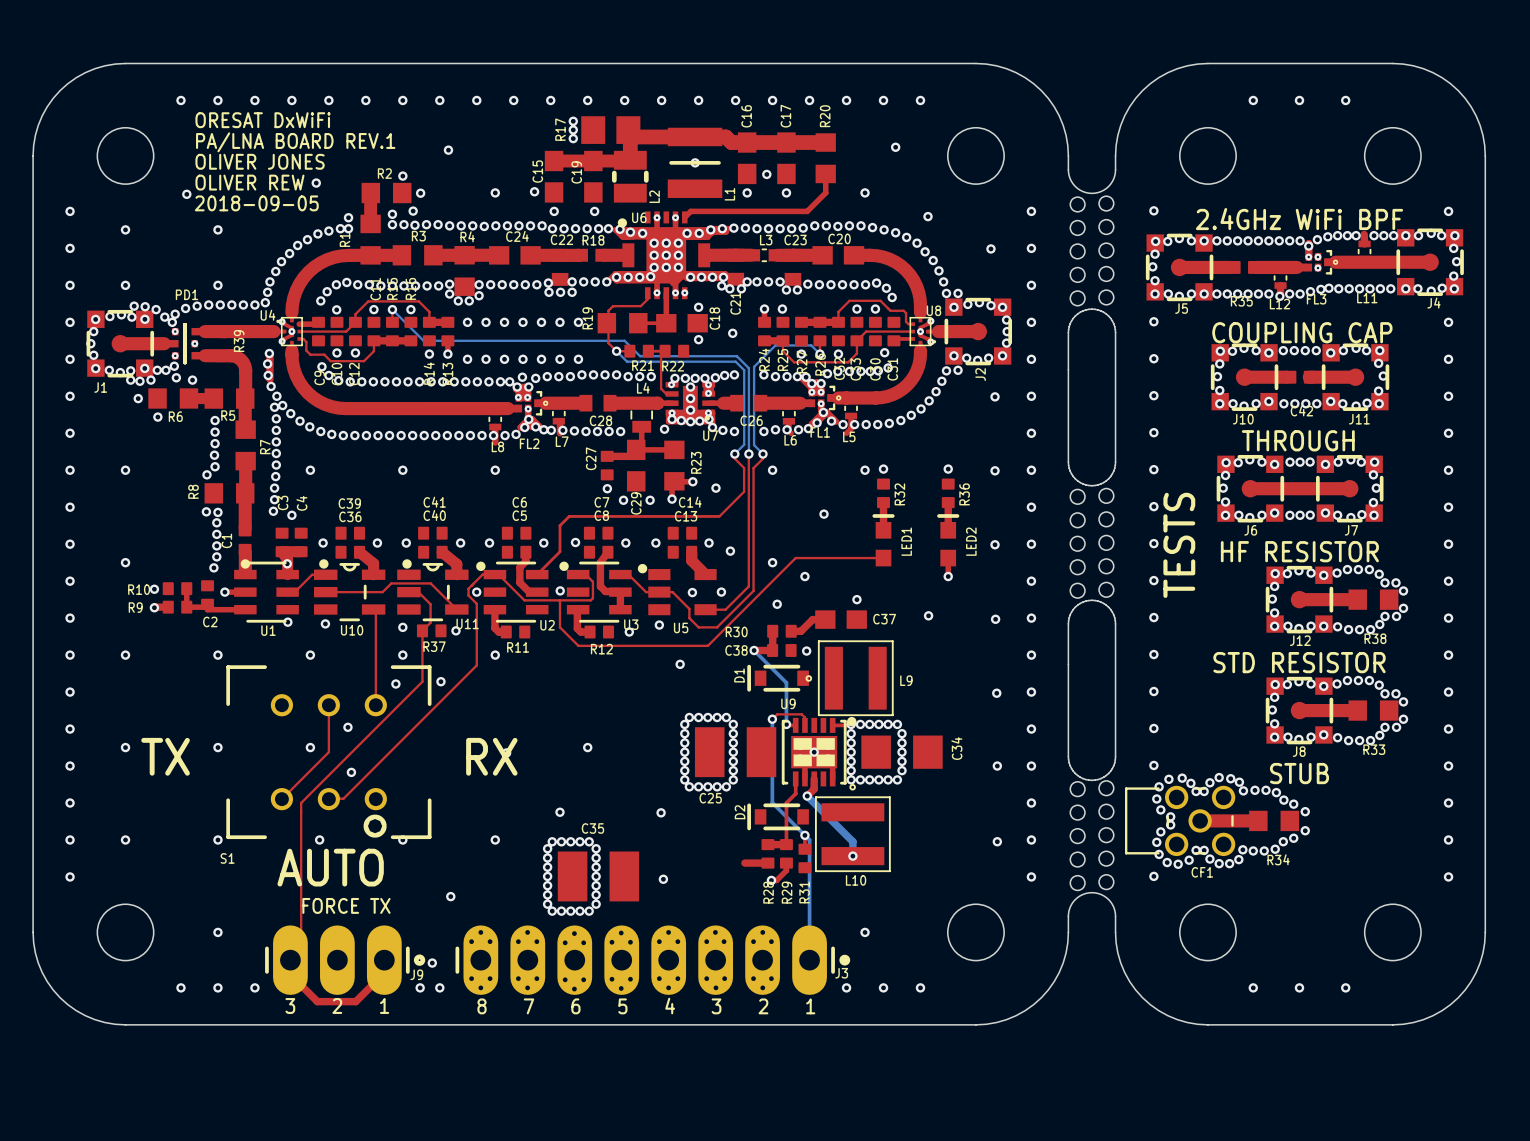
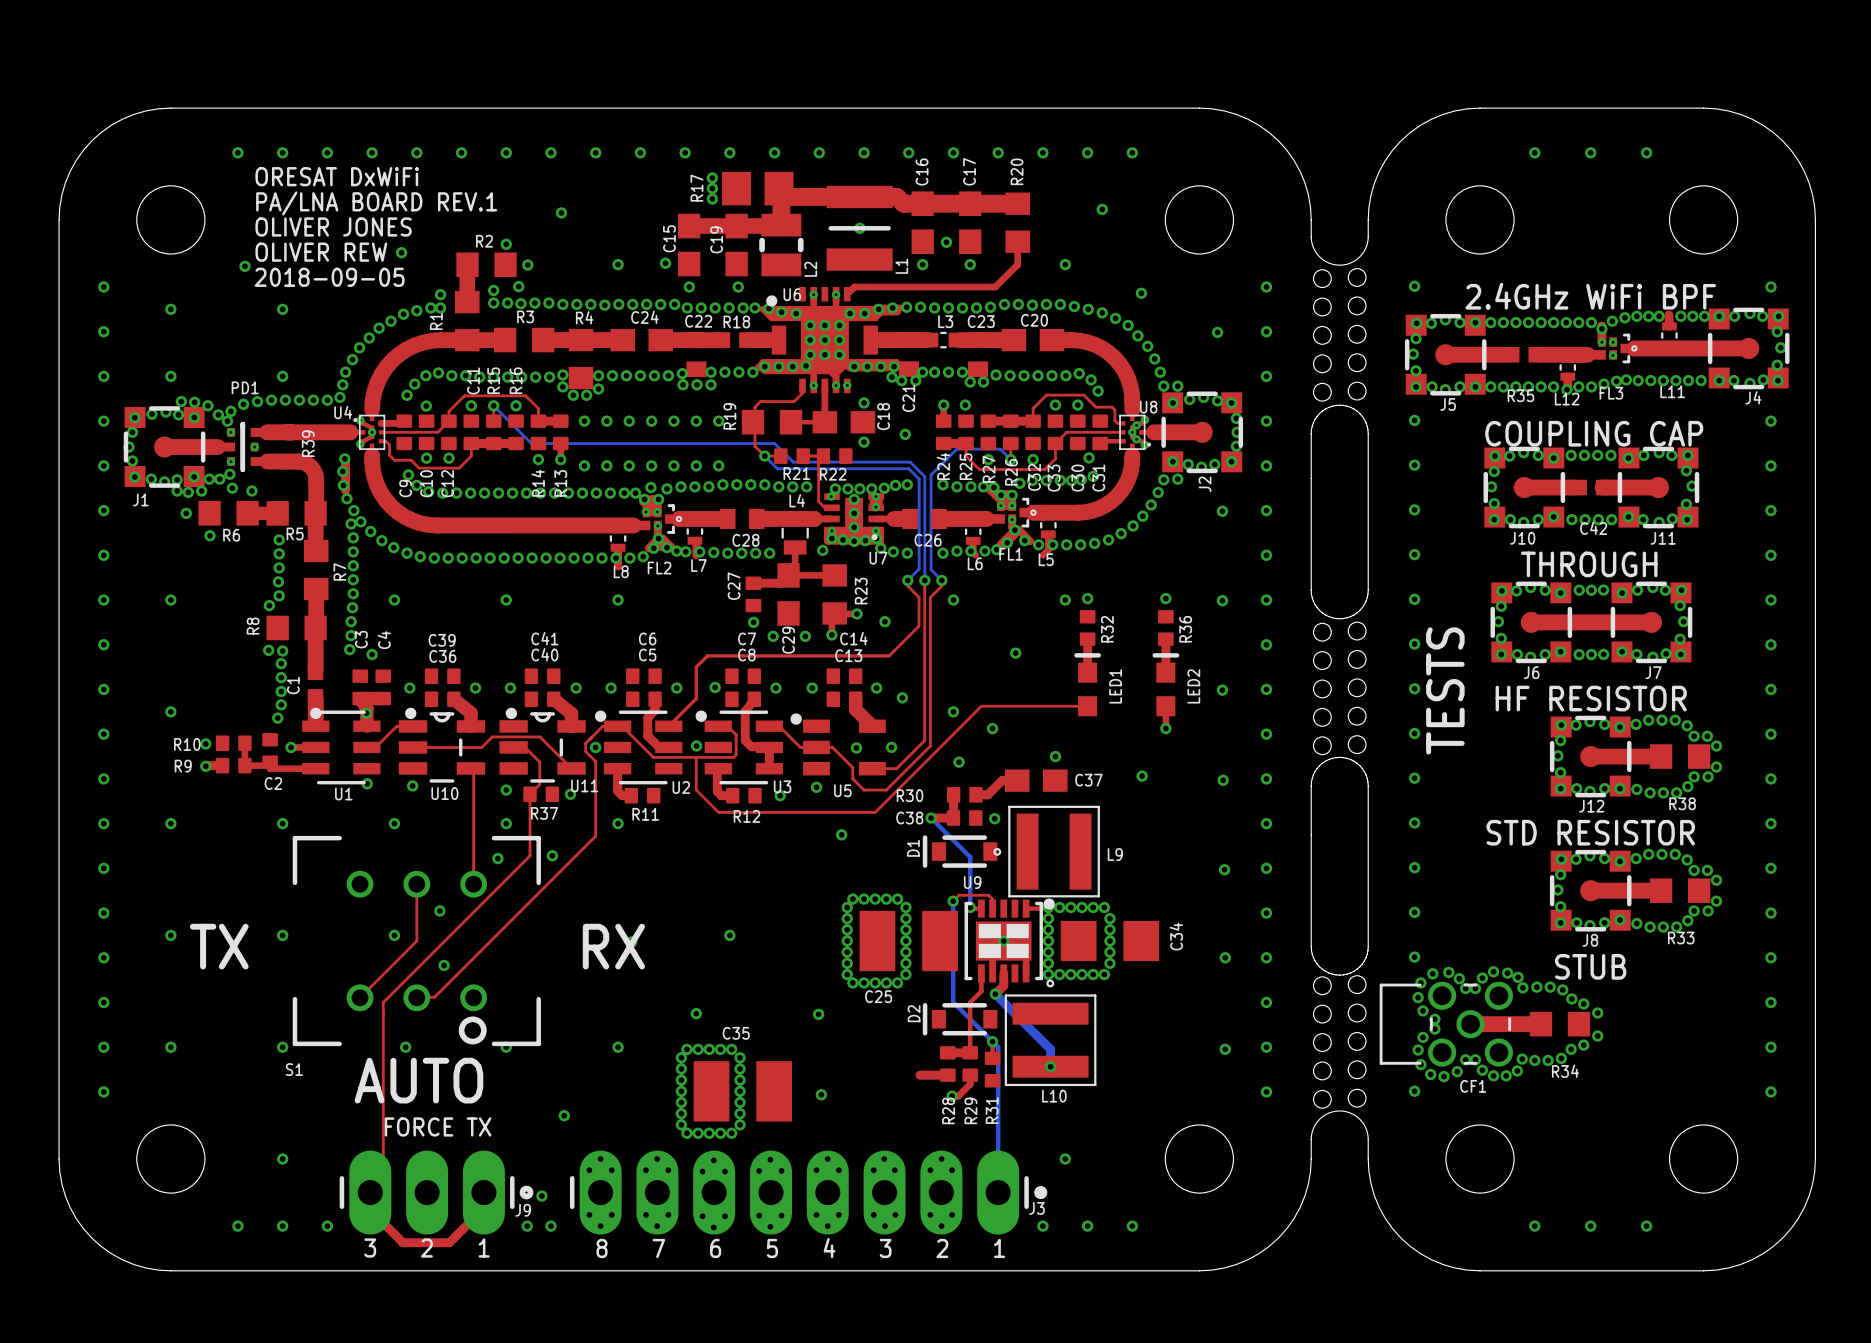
via: none -> (1136, 425)
via: none -> (1136, 439)

